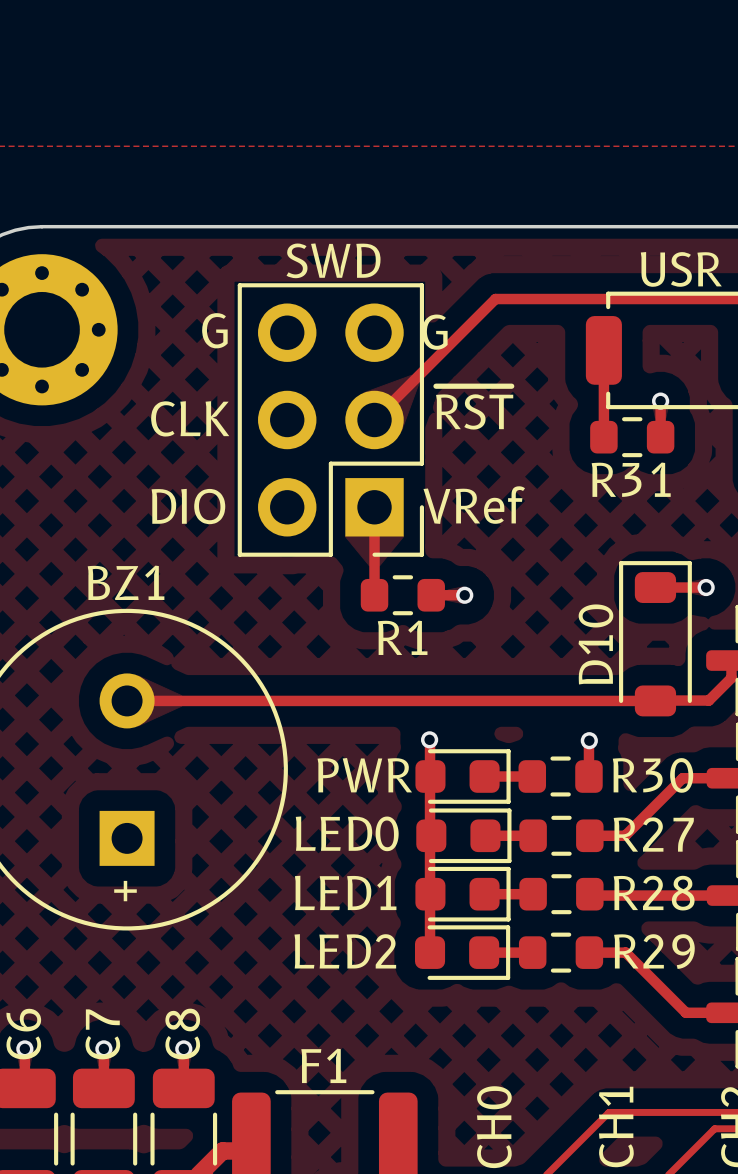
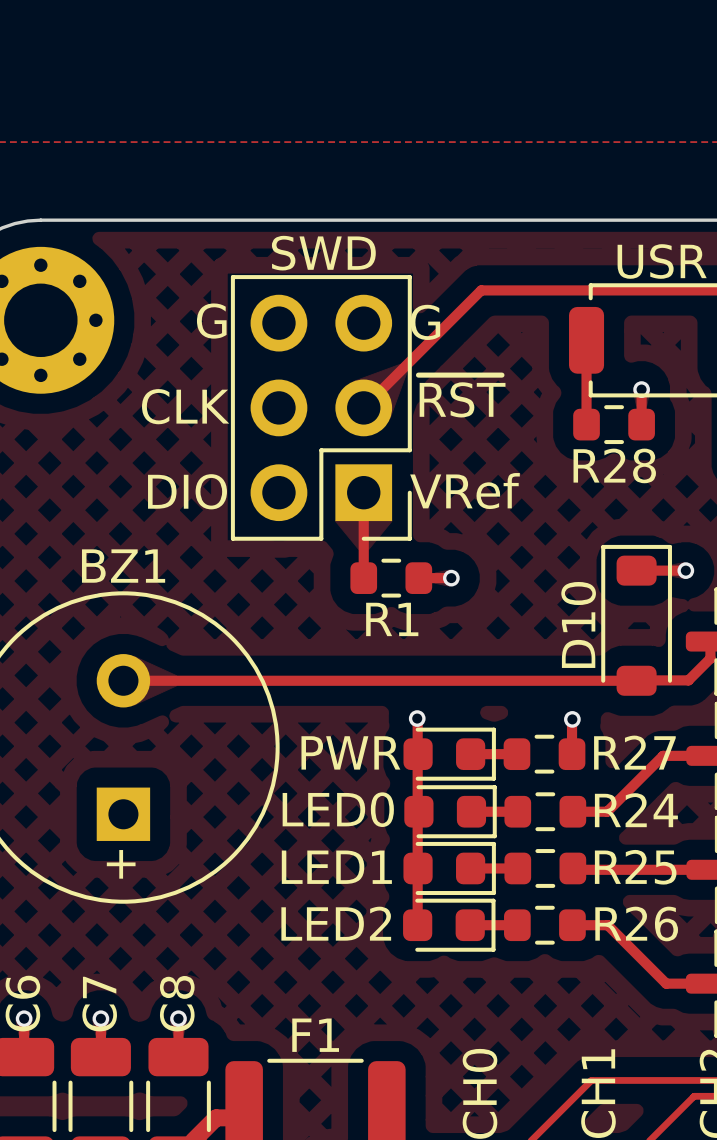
R31 name: R31 (631, 479) -> R28 (614, 465)
R30 name: R30 (653, 775) -> R27 (634, 752)
R27 name: R27 (653, 834) -> R24 (636, 810)
R28 name: R28 (654, 893) -> R25 (635, 867)
R29 name: R29 (654, 951) -> R26 (636, 923)

